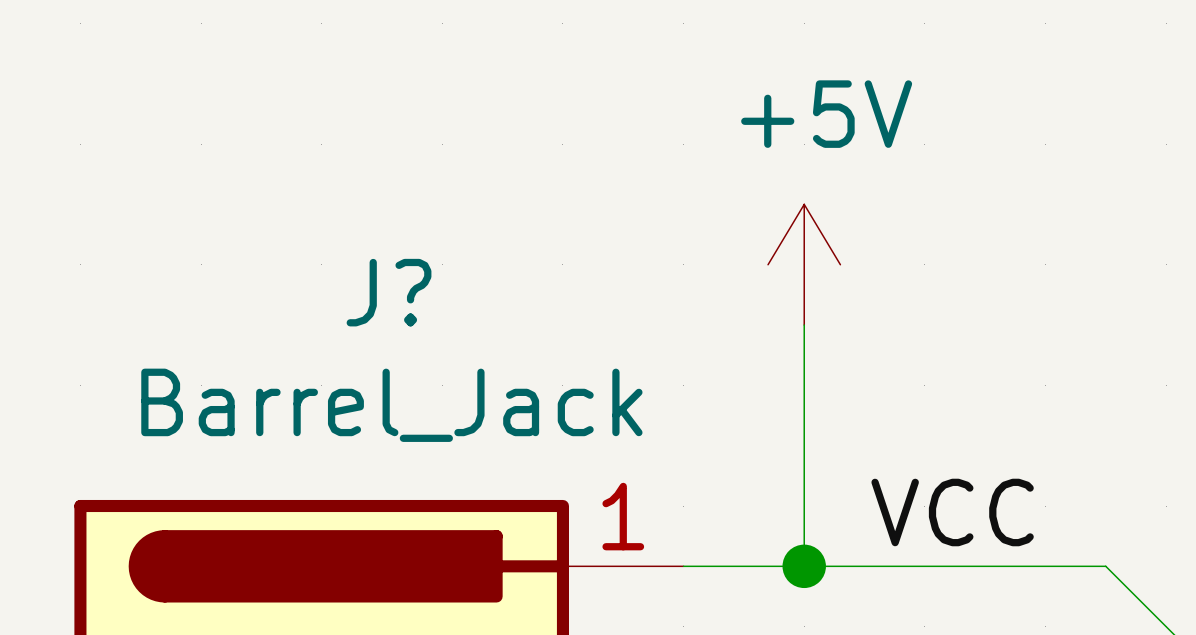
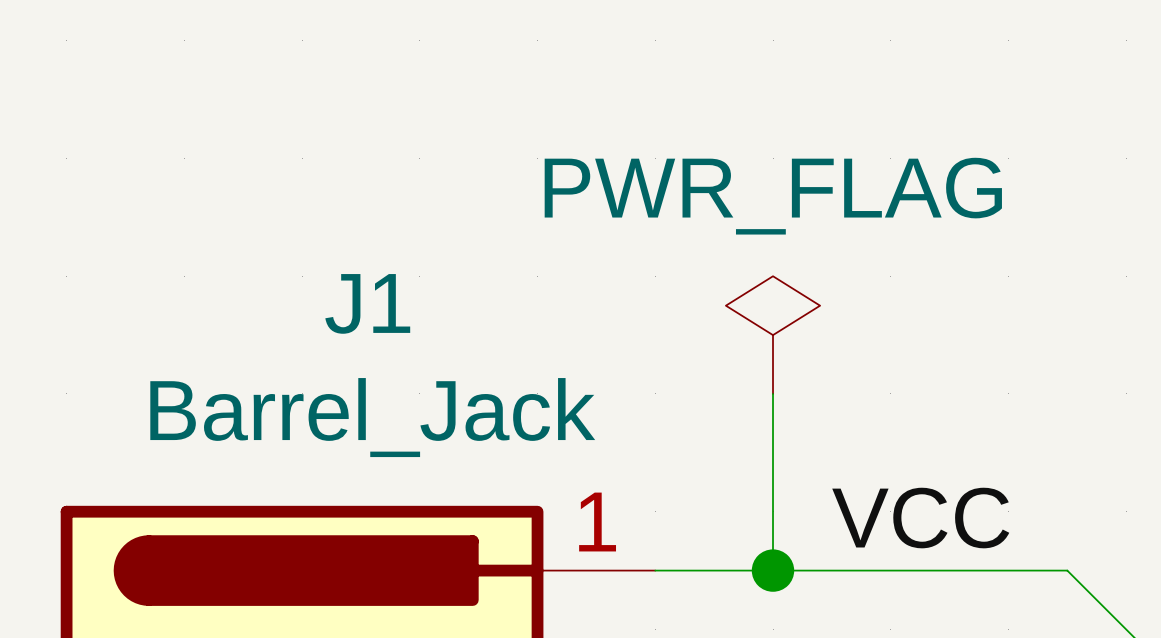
power symbol: +5V (804, 264) -> none
J? name: J? (389, 292) -> J1 (367, 303)
power symbol: none -> PWR_FLAG (773, 335)

